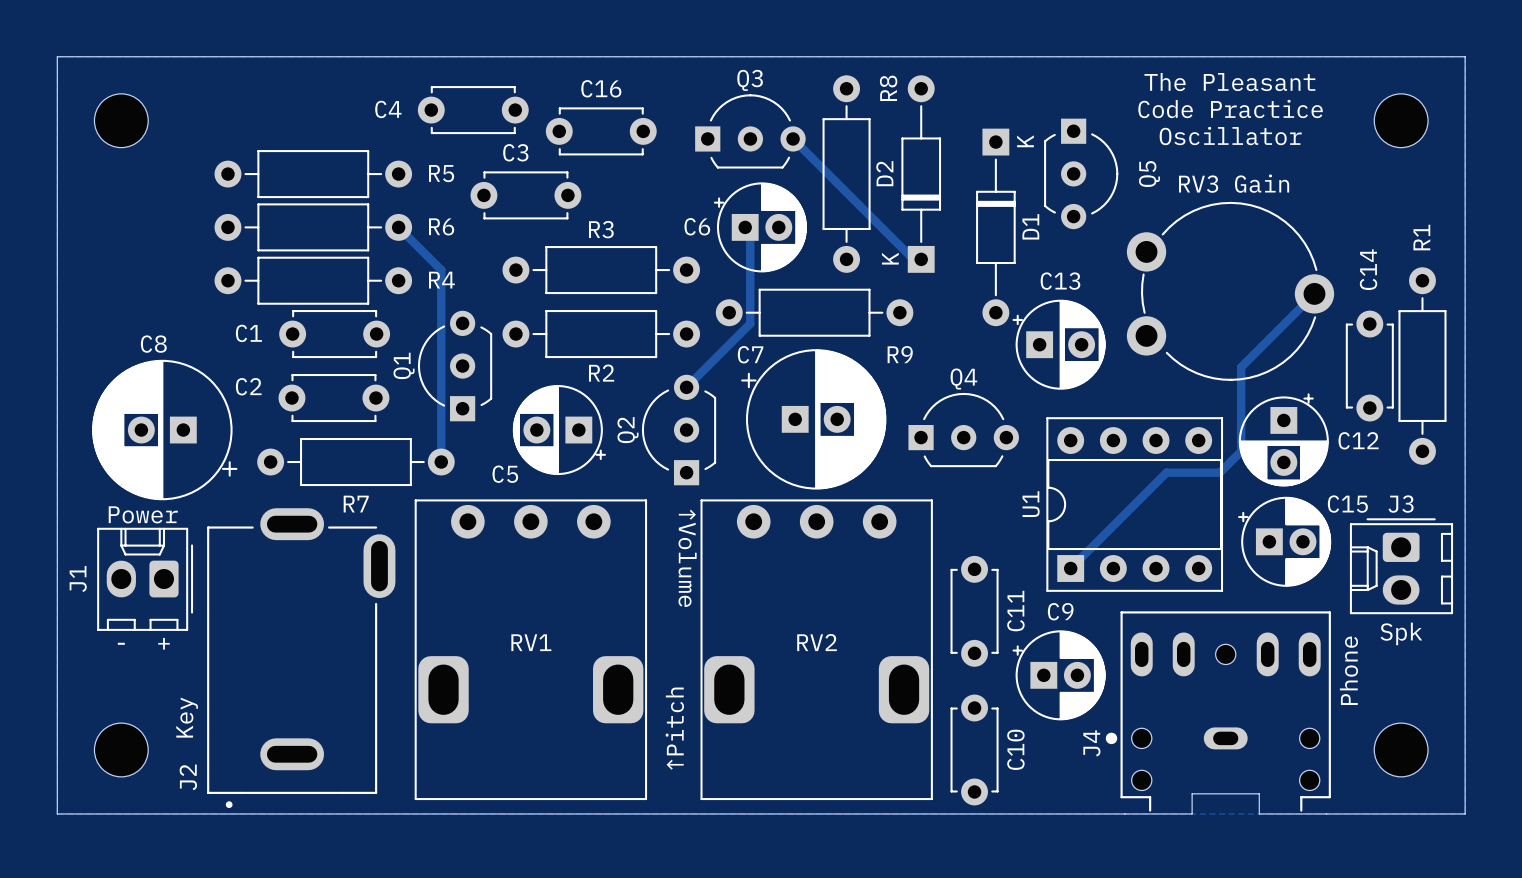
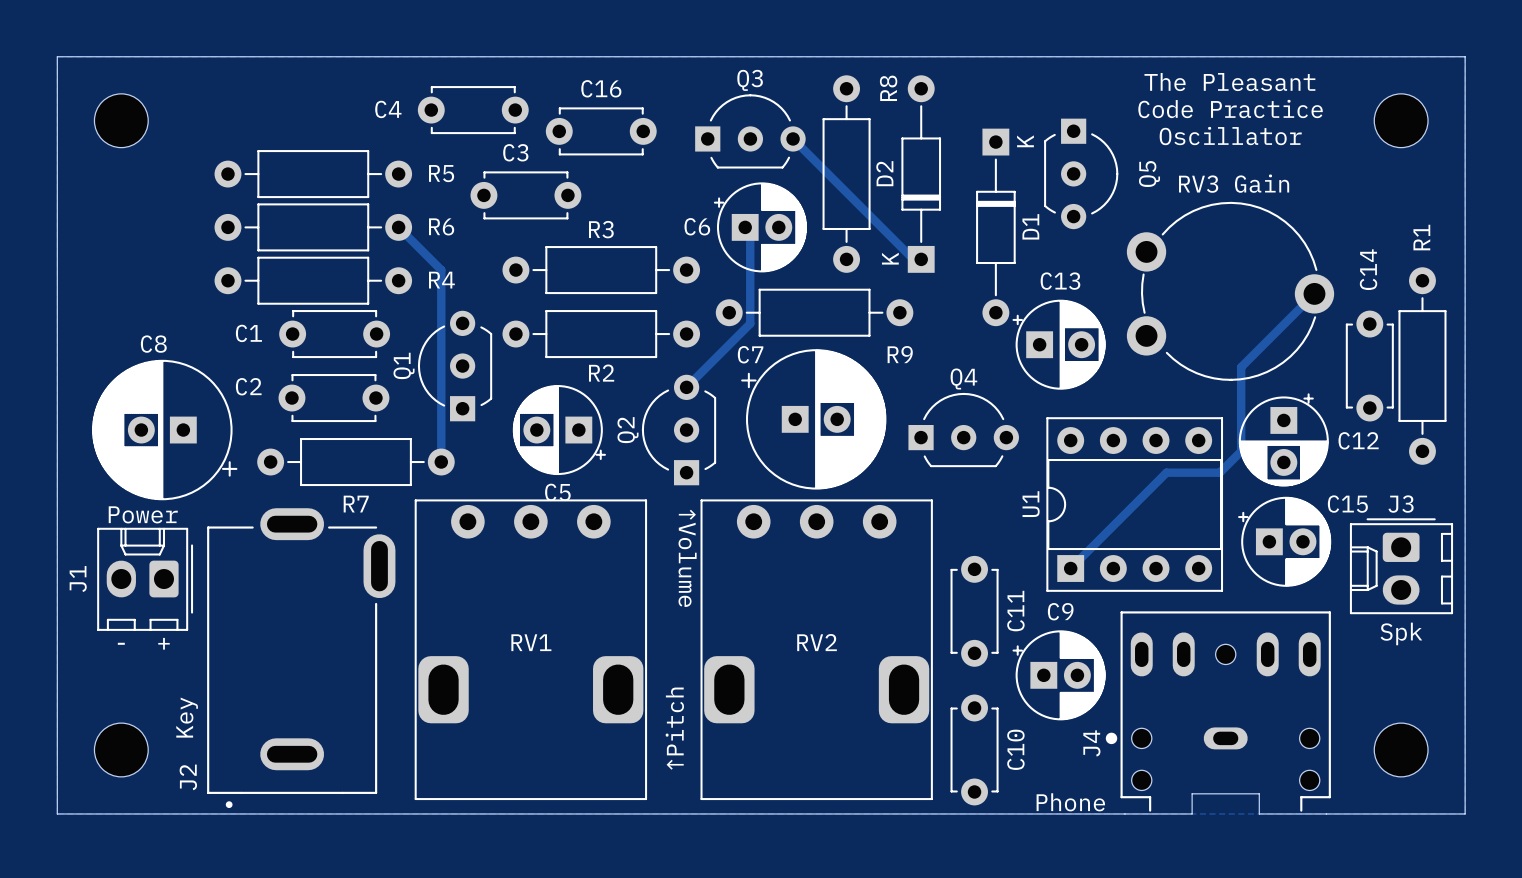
C5 name position: C5 (505, 474) -> C5 (557, 492)
text rotation: 0° (1348, 670) -> 90° clockwise (1070, 802)
text position: Phone (1348, 670) -> Phone (1070, 802)

